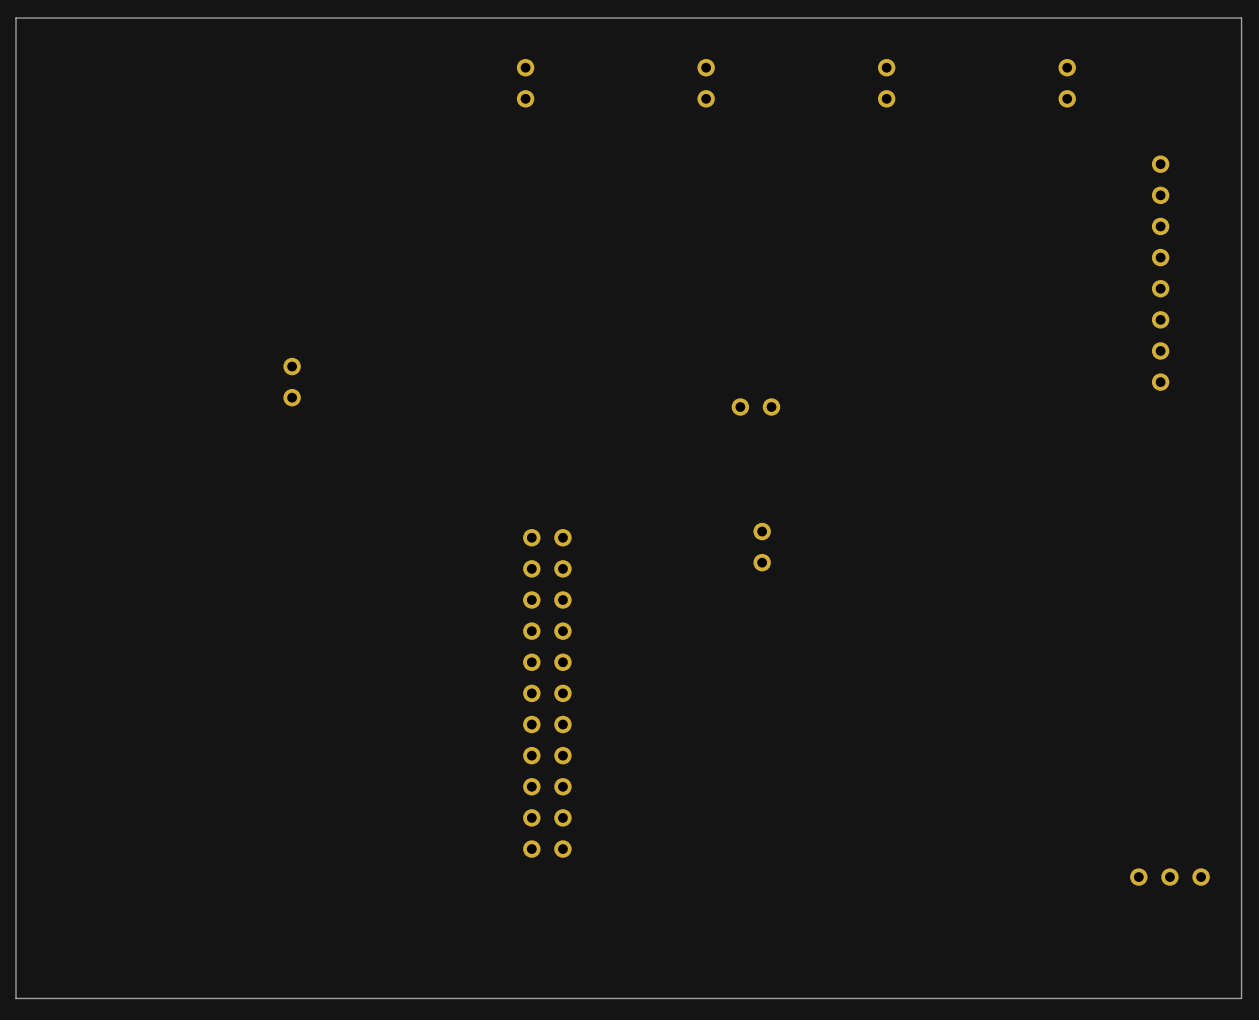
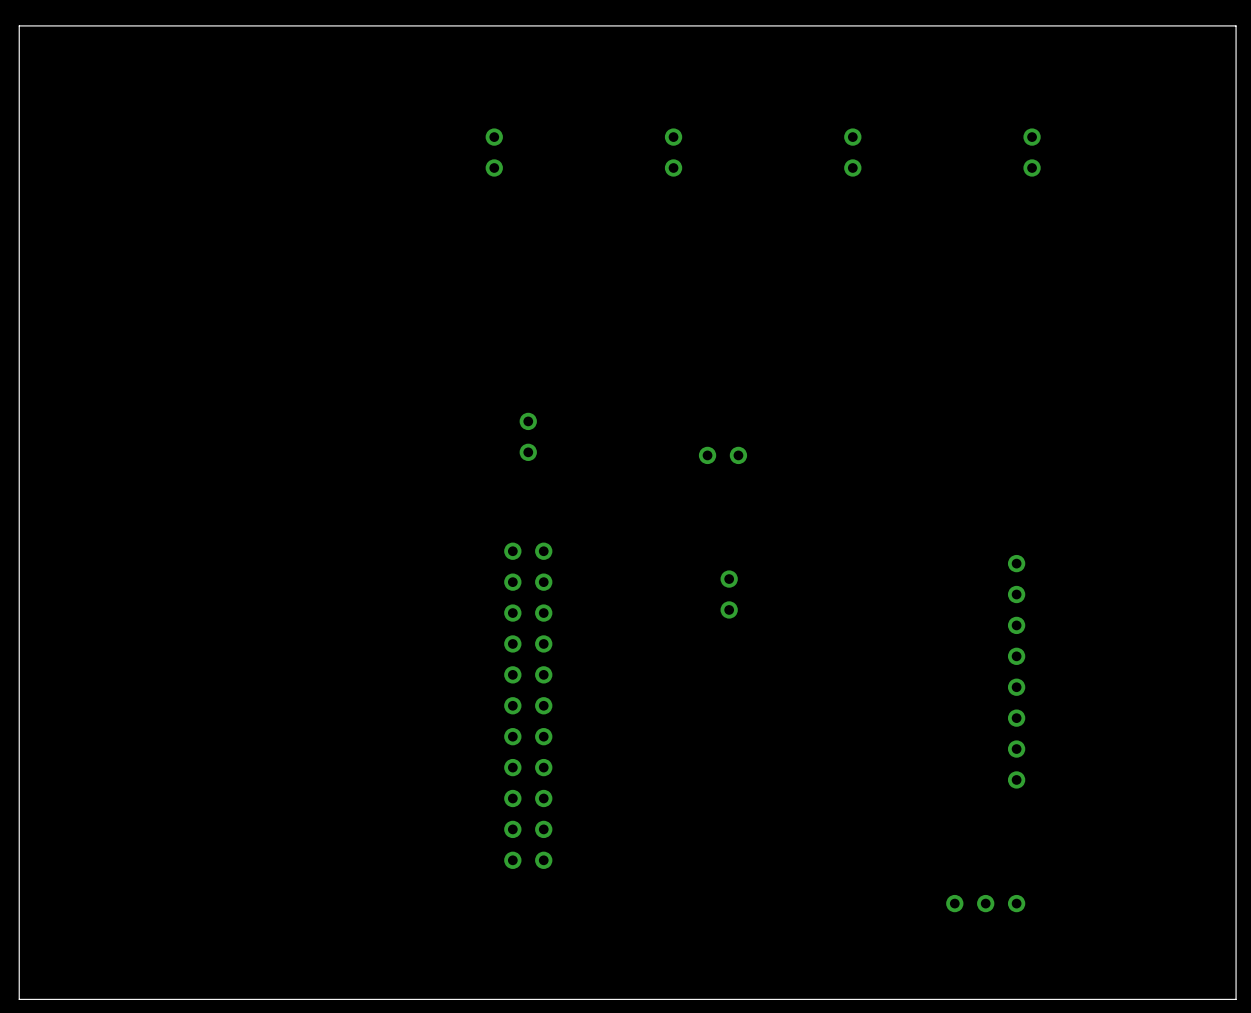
part position: (525, 83) -> (494, 152)
part position: (706, 83) -> (673, 152)
part position: (886, 83) -> (852, 152)
part position: (1067, 83) -> (1032, 152)
part: (1160, 273) -> none
part: (292, 382) -> none
part: (755, 407) -> none
part: none -> (528, 436)
part: none -> (722, 455)
part: (762, 547) -> none
part: none -> (729, 594)
part: none -> (1016, 671)
part: (531, 693) -> none
part: (562, 693) -> none
part: none -> (512, 705)
part: none -> (543, 705)
part position: (1169, 877) -> (985, 903)

